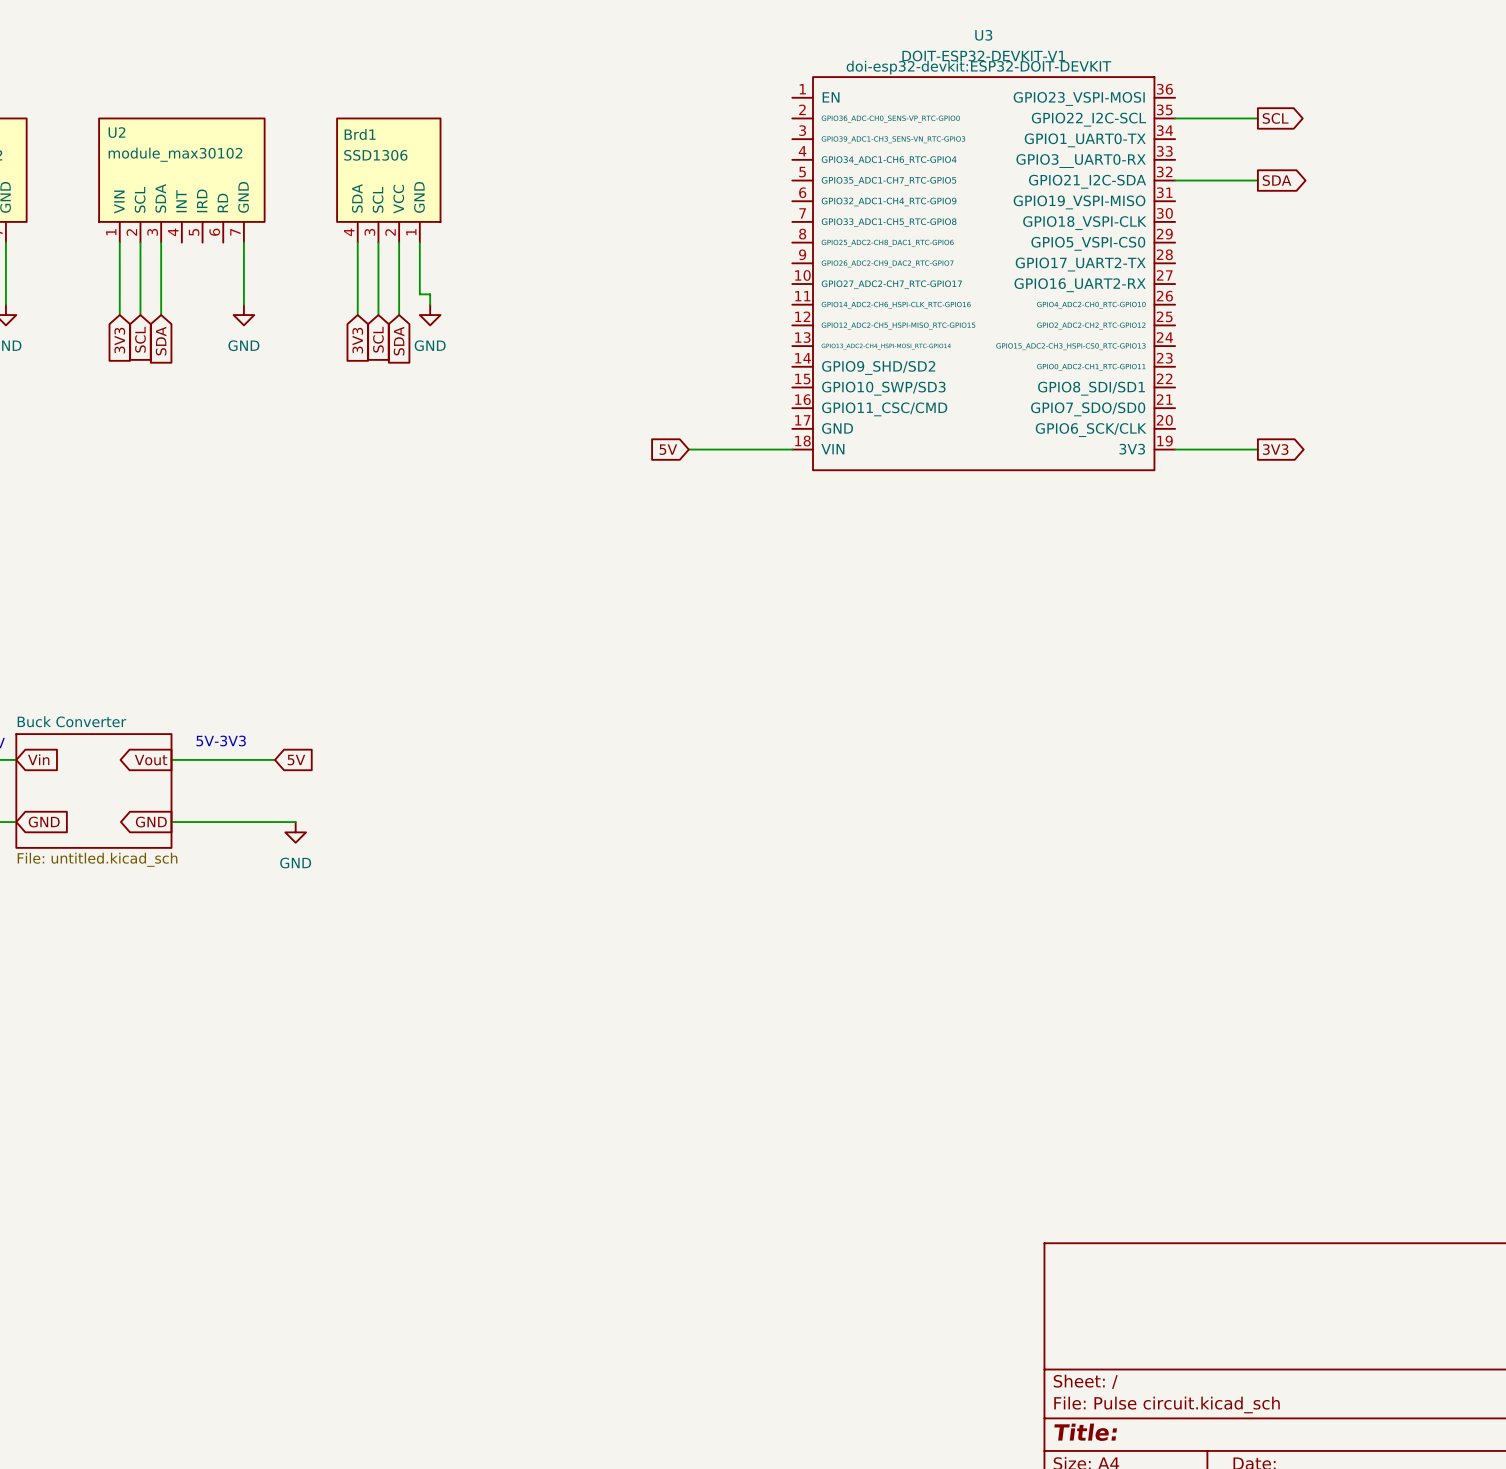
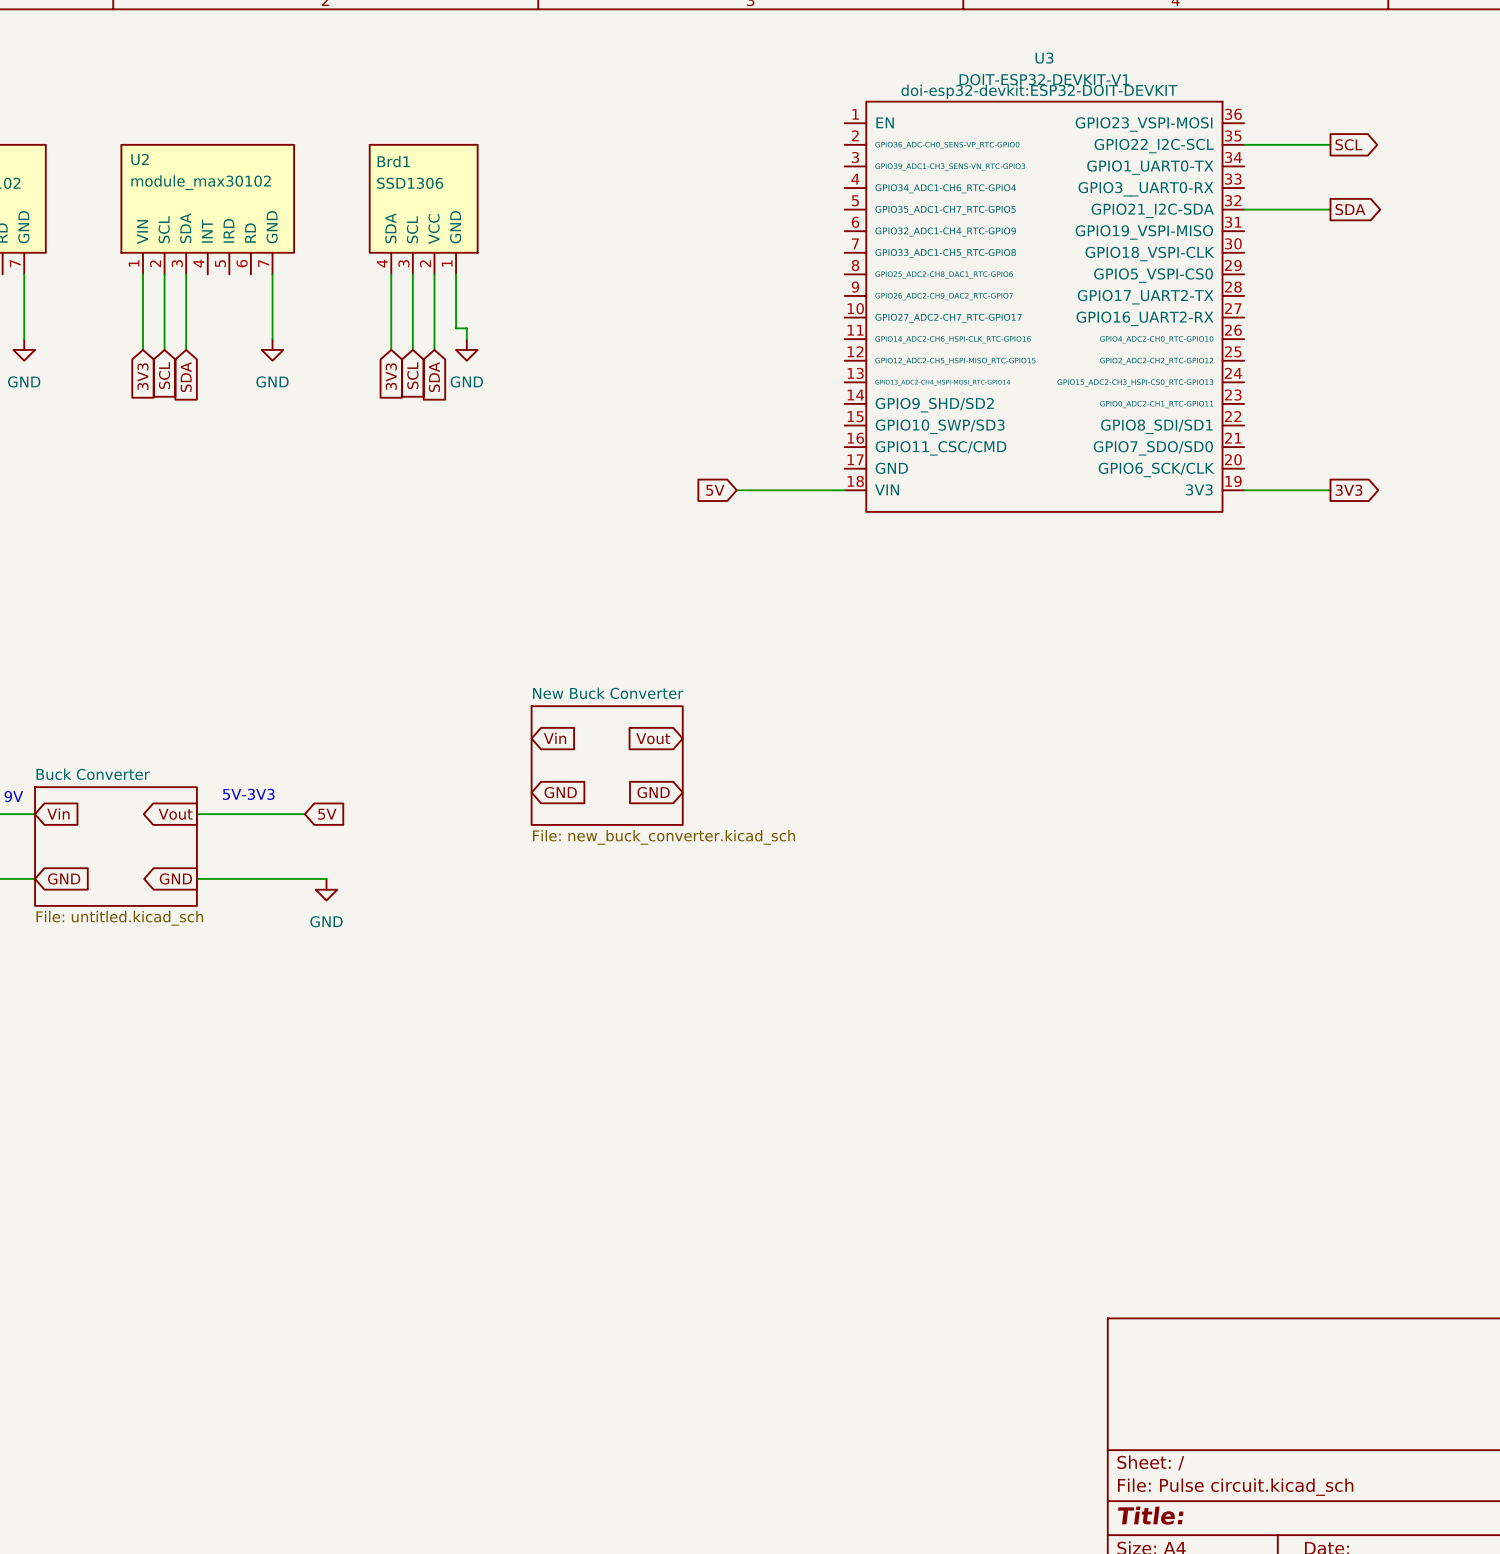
global label: none -> Vin (555, 738)
global label: none -> Vout (653, 738)
sheet New Buck Converter: none -> File: new_buck_converter.kicad_sch (607, 765)
global label: none -> GND (560, 792)
global label: none -> GND (653, 792)

